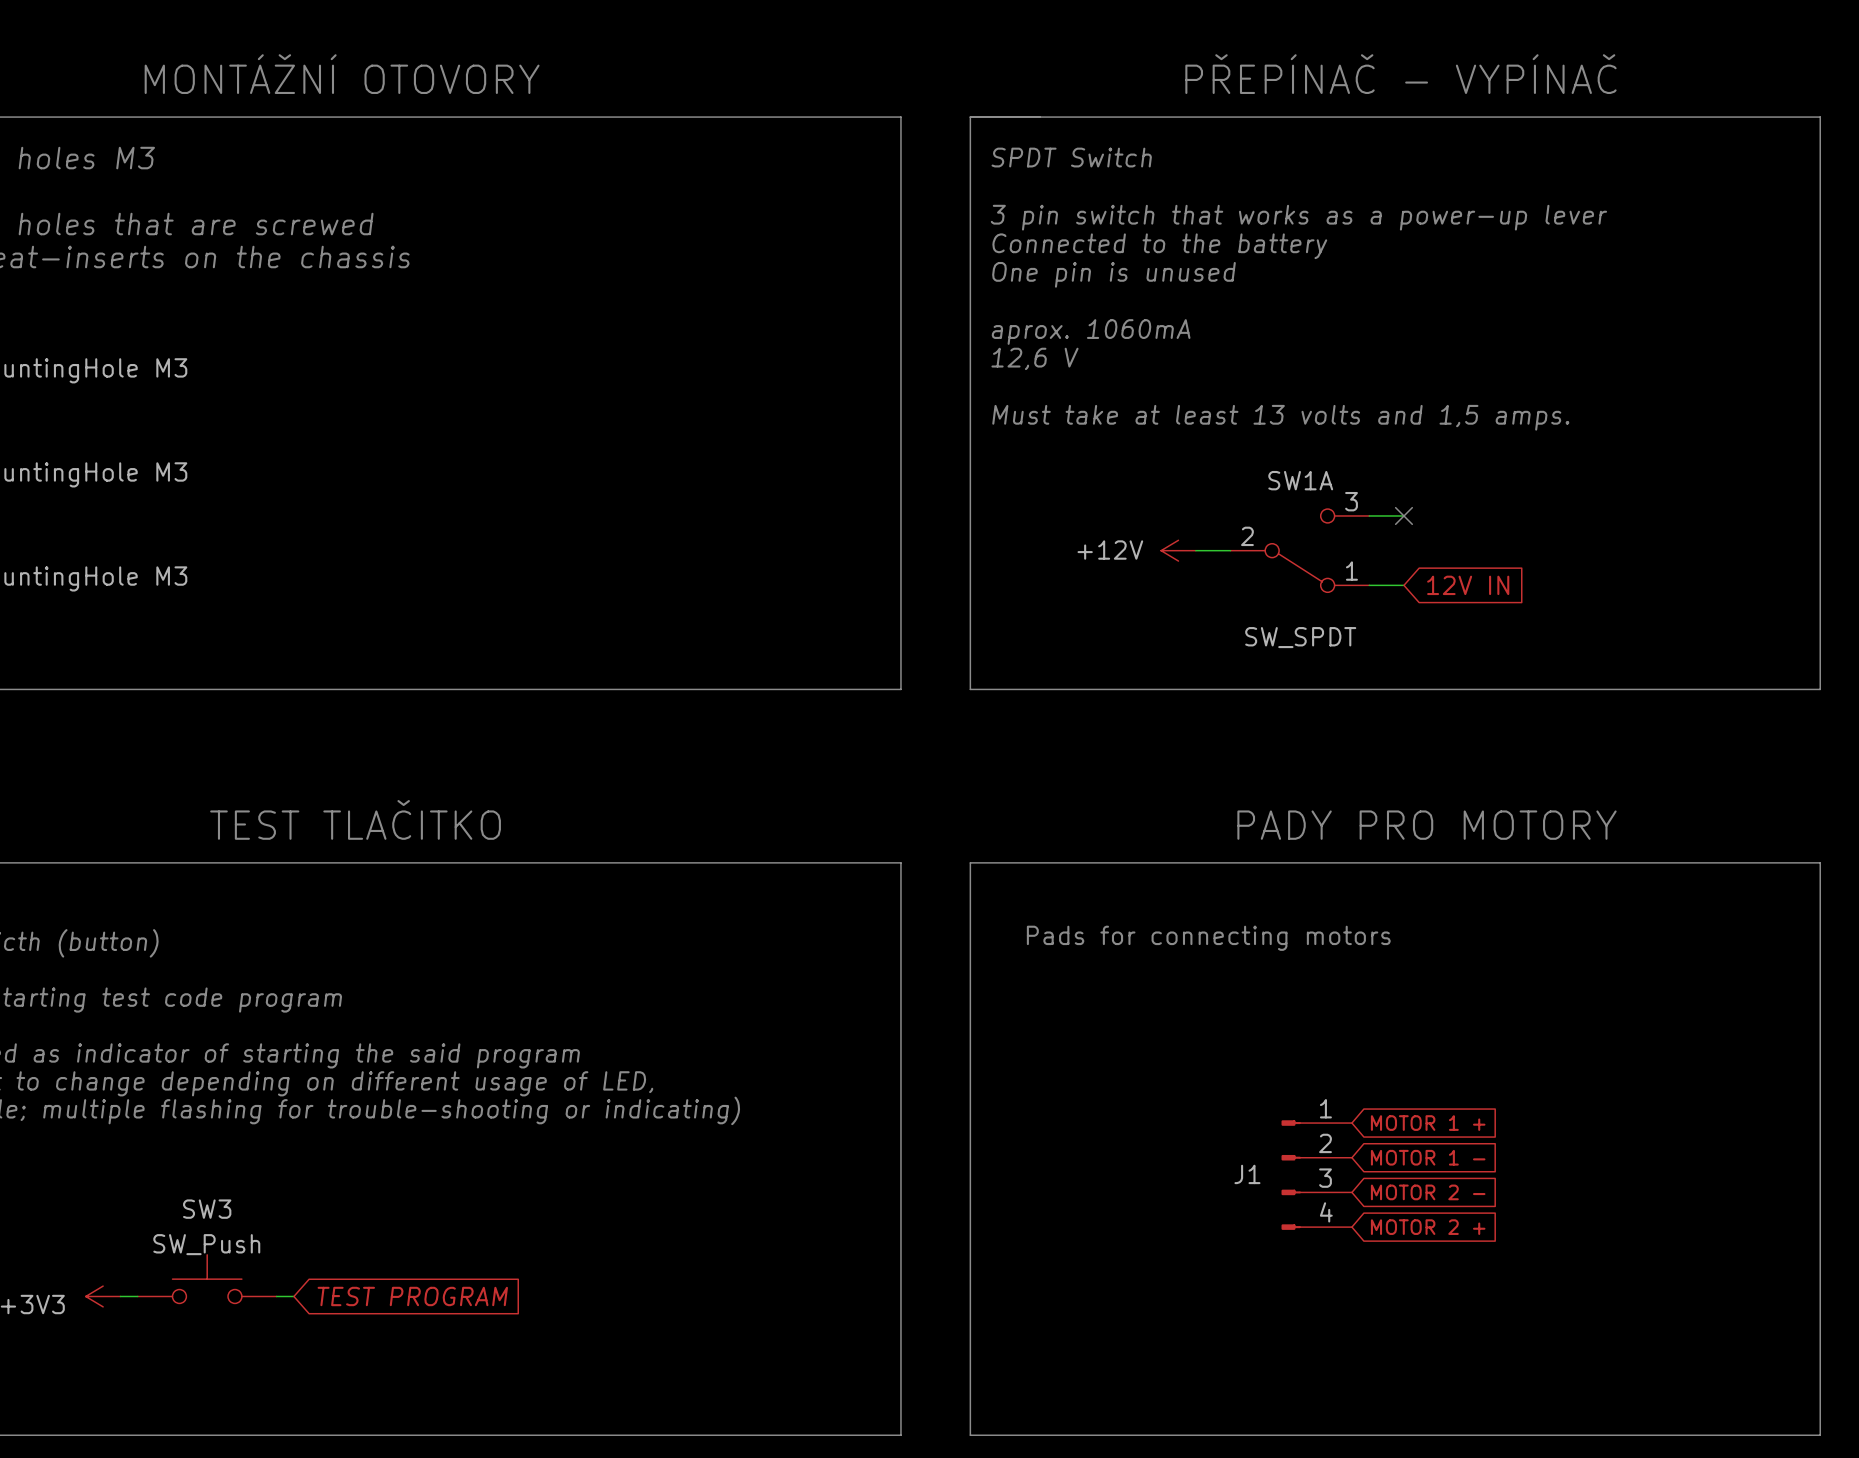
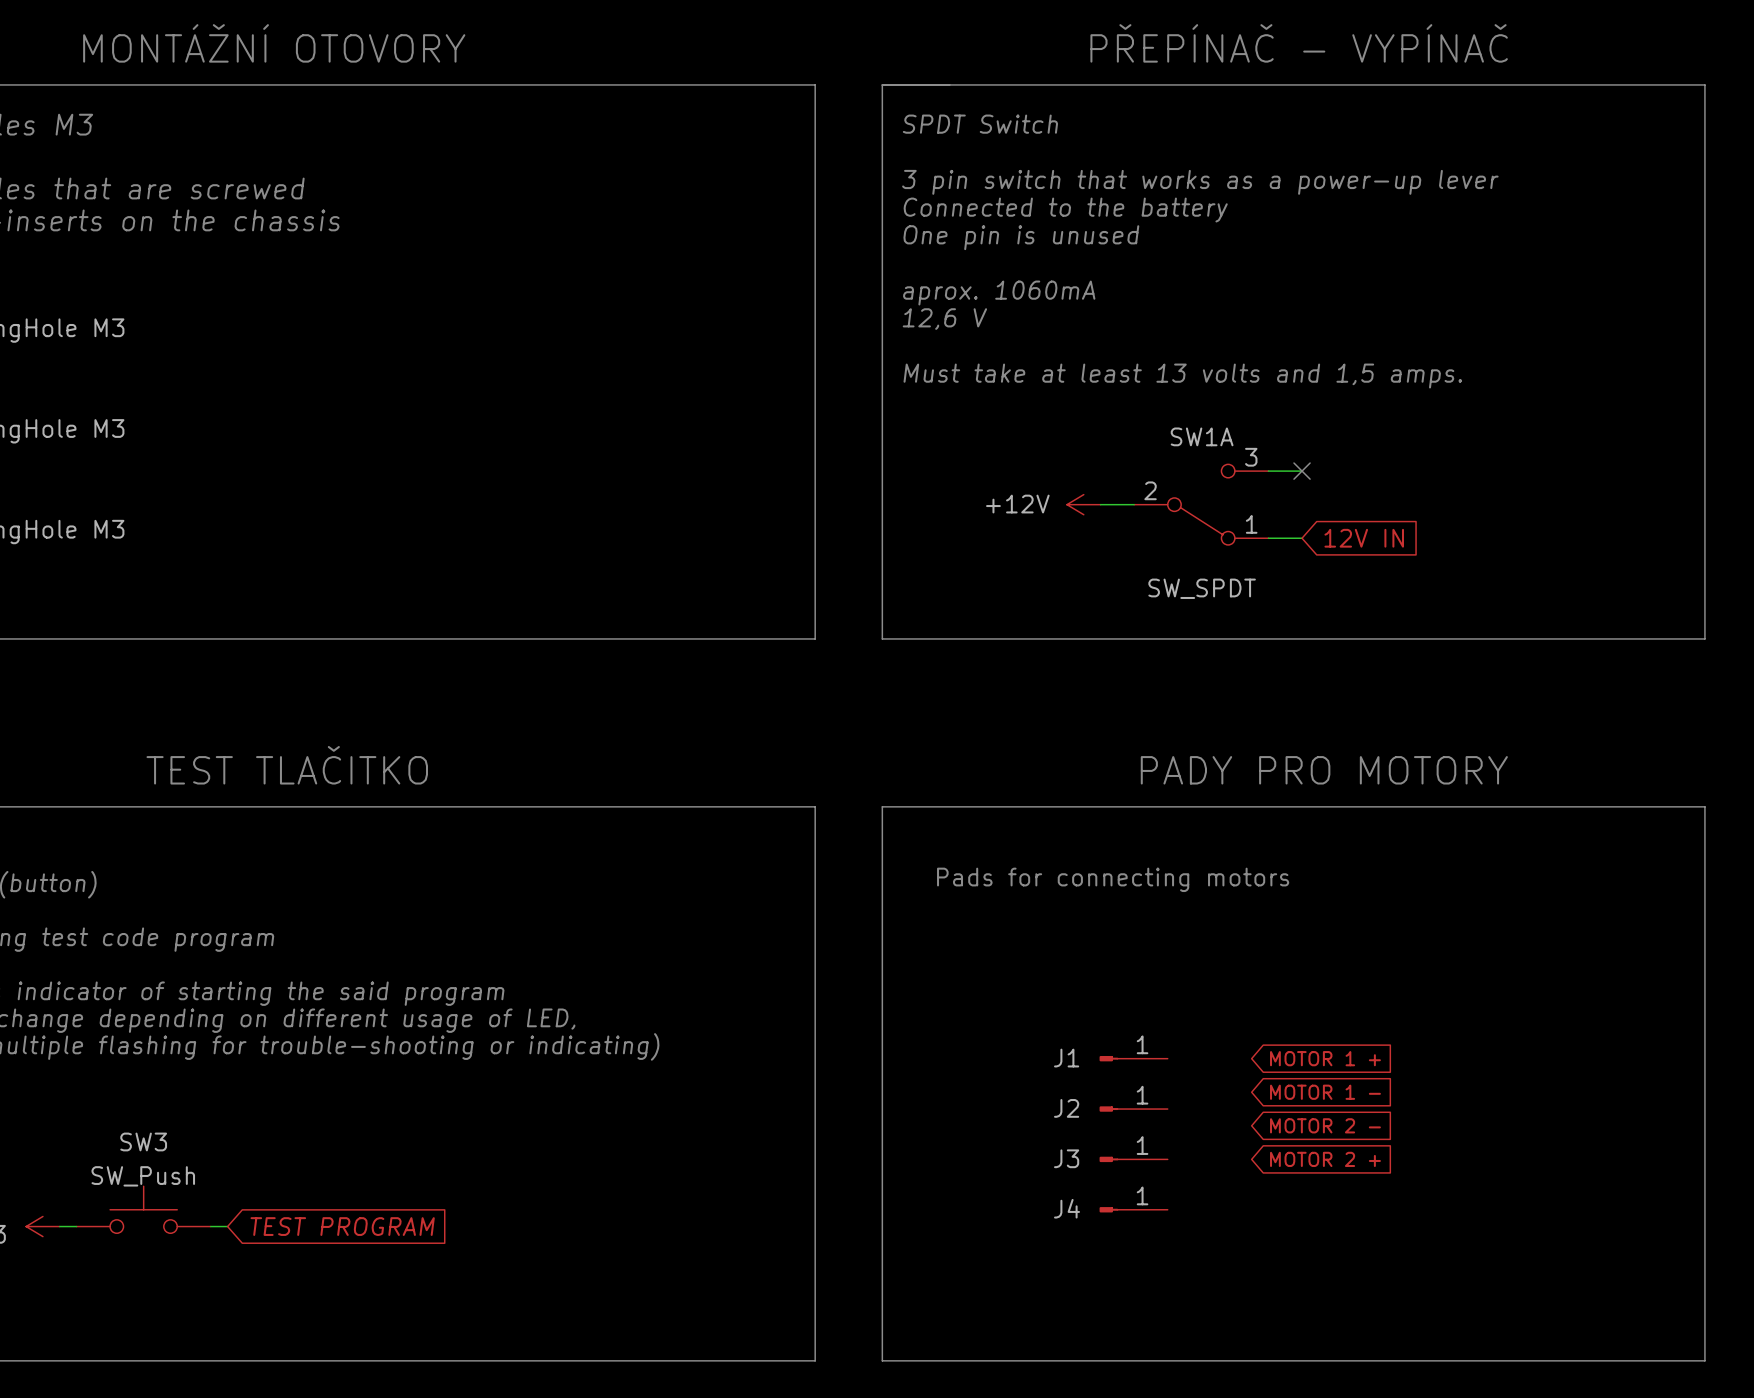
J1 symbol: [1281, 1120, 1352, 1230] -> [1099, 1055, 1168, 1062]
J2: none -> (1133, 1109)
J3: none -> (1133, 1159)
J4: none -> (1133, 1209)

